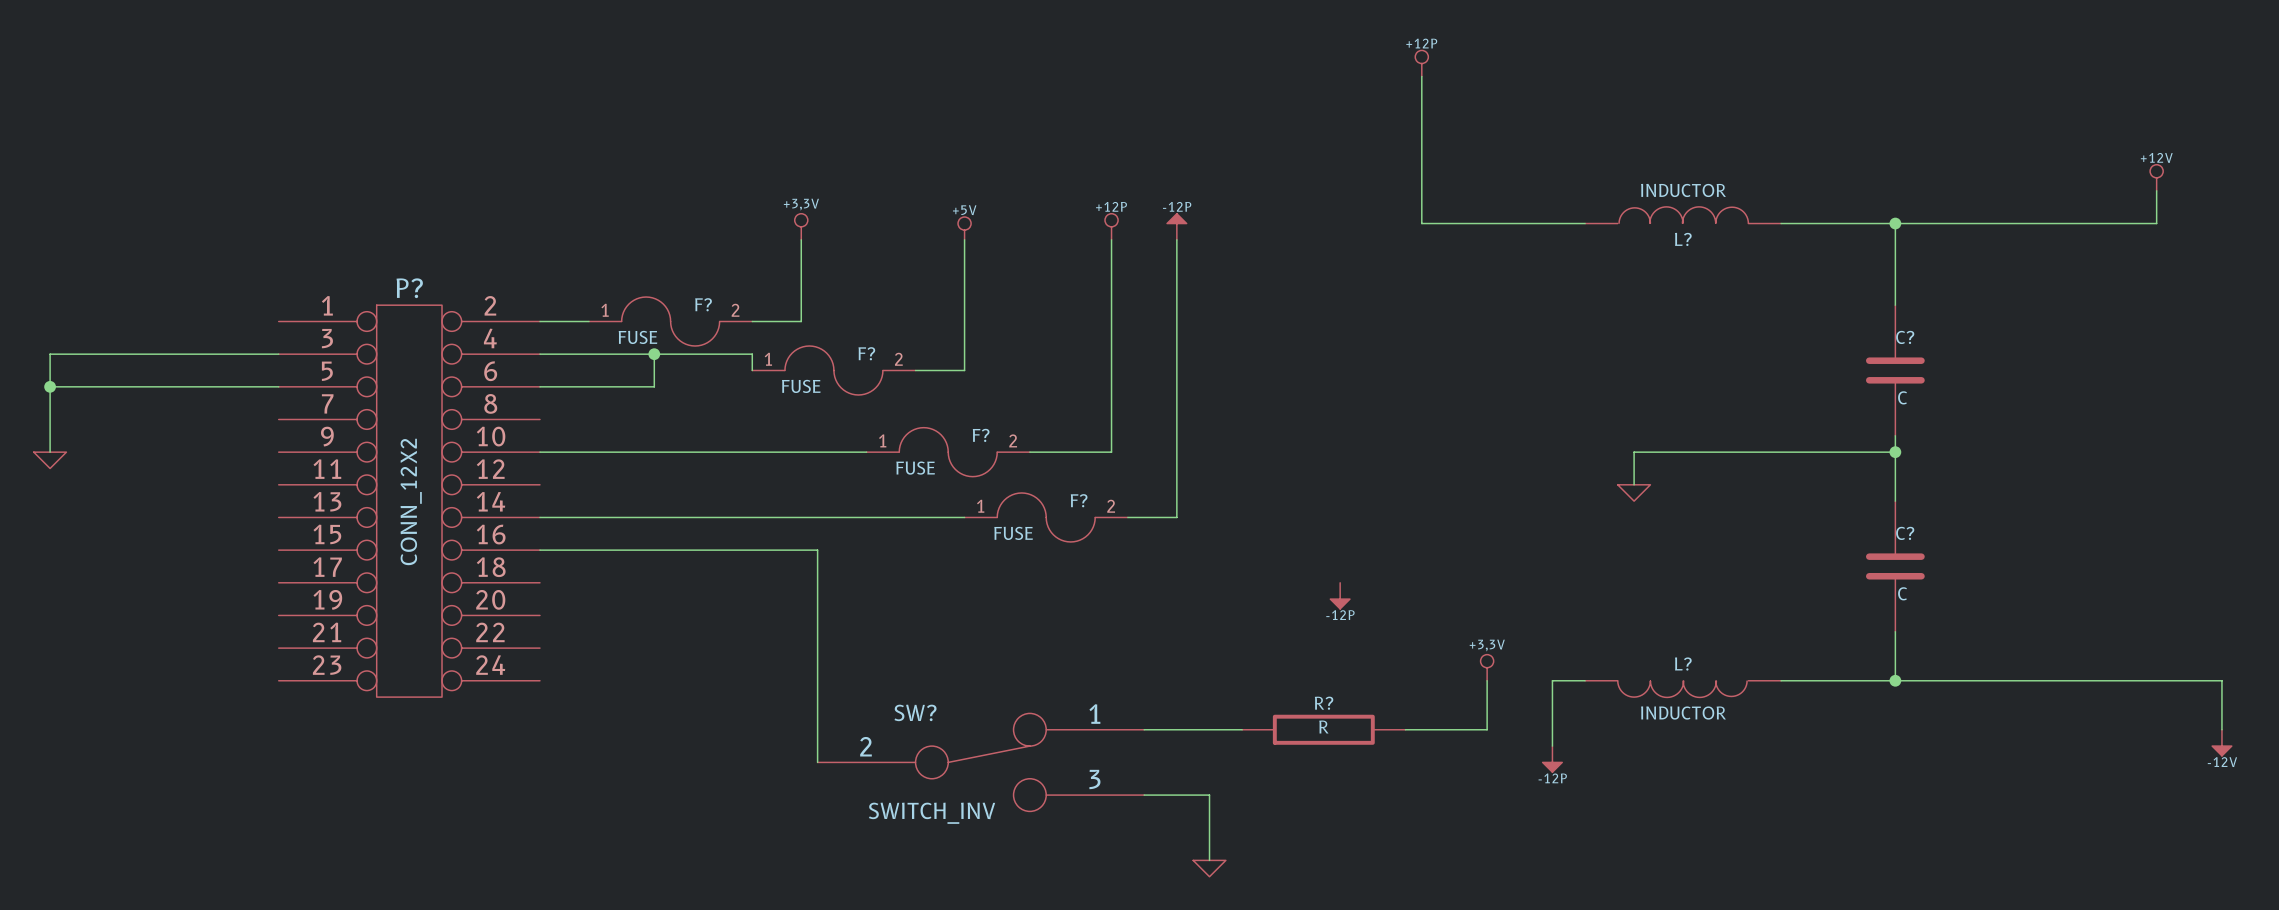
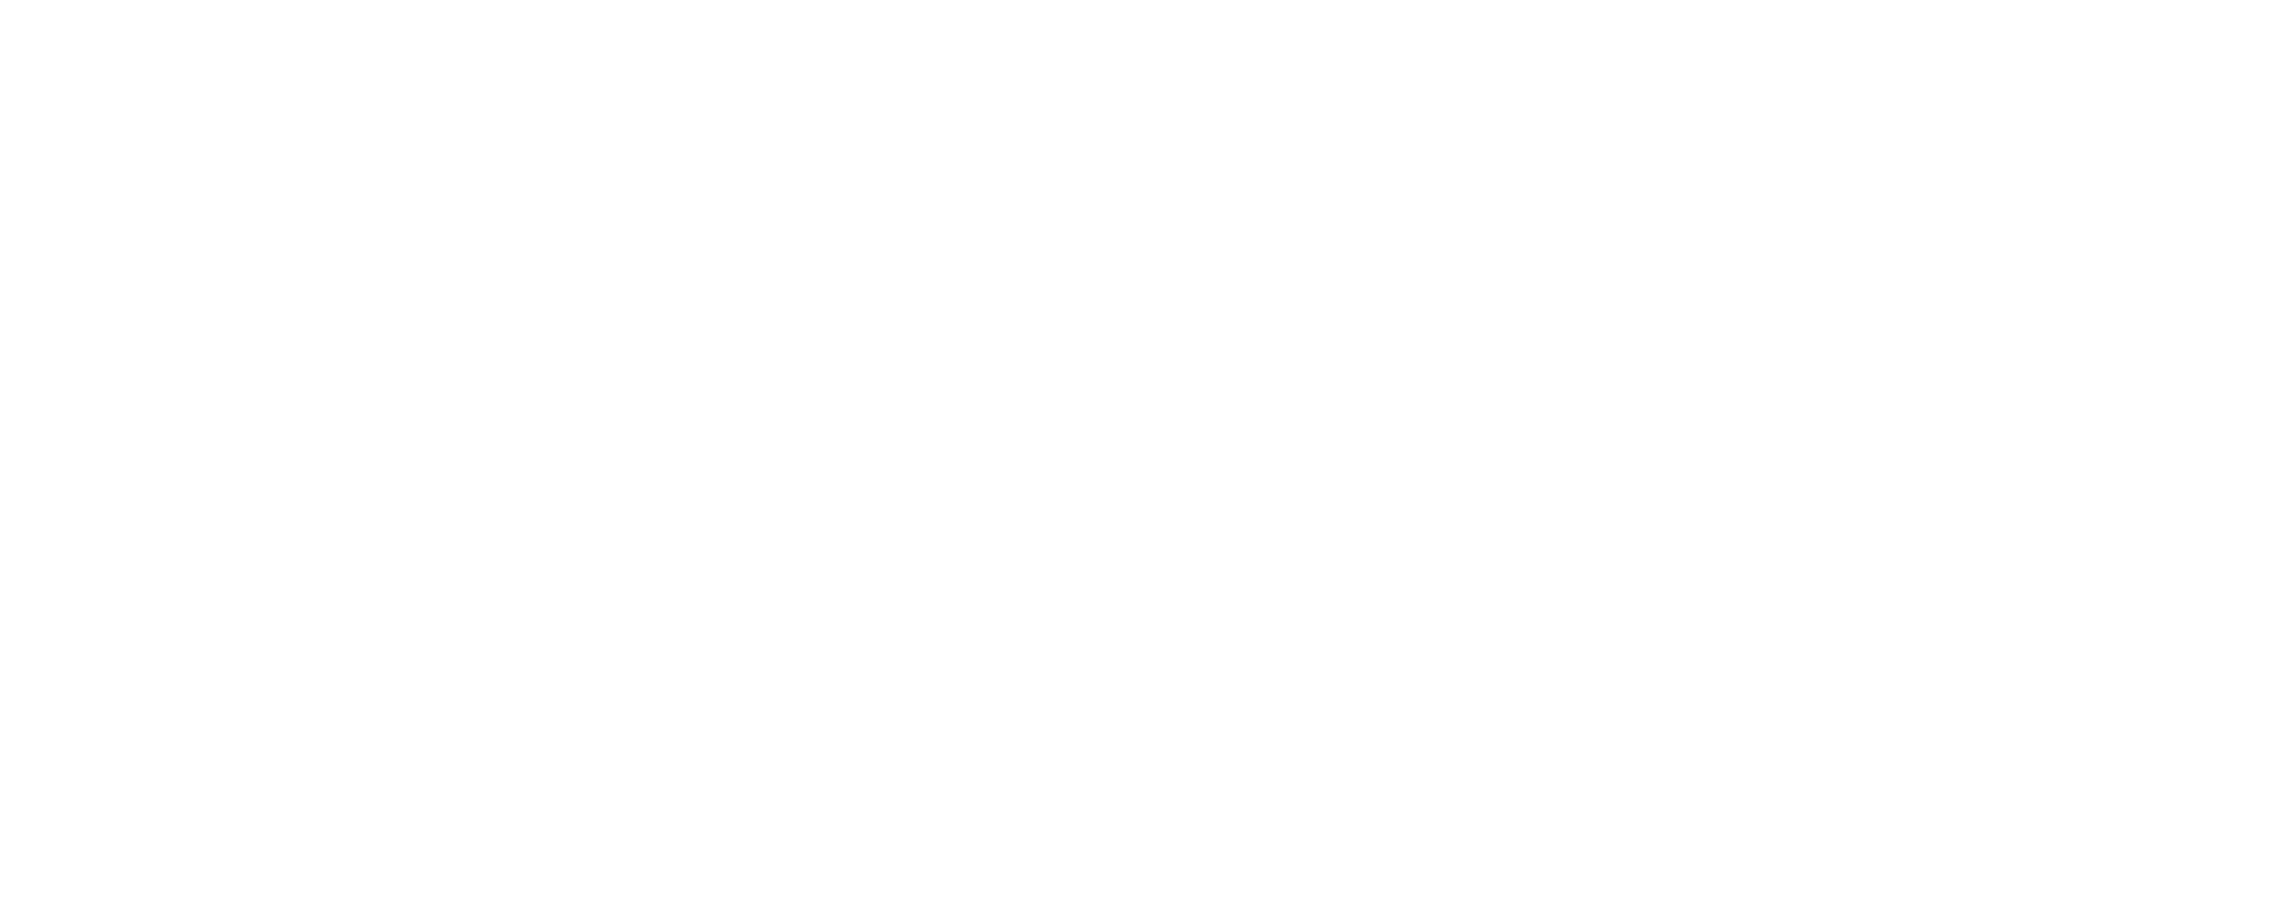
power symbol: +12P (1421, 63) -> none
wire: (1421, 76) (1421, 223) (1585, 223) -> none
power symbol: +12V (2156, 177) -> none
wire: (2156, 190) (2156, 223) (1781, 223) -> none
L?: INDUCTOR (1683, 215) -> none
wire: (1895, 223) (1895, 305) -> none
junction: (1895, 223) -> none
power symbol: +3,3V (801, 226) -> none
power symbol: +12P (1111, 226) -> none
power symbol: -12P (1176, 226) -> none
power symbol: +5V (964, 228) -> none
wire: (801, 239) (801, 321) (752, 321) -> none
wire: (964, 239) (964, 370) (915, 370) -> none
wire: (1111, 239) (1111, 452) (1029, 452) -> none
wire: (1176, 239) (1176, 517) (1127, 517) -> none
wire: (539, 321) (588, 321) -> none
F?: FUSE (670, 321) -> none
wire: (278, 354) (50, 354) (50, 452) -> none
wire: (539, 354) (752, 354) (752, 370) -> none
wire: (654, 354) (654, 386) (539, 386) -> none
junction: (654, 354) -> none
F?: FUSE (833, 370) -> none
C?: C (1895, 370) -> none
wire: (50, 386) (278, 386) -> none
junction: (50, 386) -> none
wire: (1895, 435) (1895, 501) -> none
wire: (539, 452) (866, 452) -> none
F?: FUSE (948, 452) -> none
wire: (1895, 452) (1634, 452) (1634, 484) -> none
junction: (1895, 452) -> none
power symbol: (50, 460) -> none
power symbol: (1634, 492) -> none
P?: CONN_12X2 (409, 501) -> none
wire: (539, 517) (964, 517) -> none
F?: FUSE (1046, 517) -> none
wire: (539, 550) (817, 550) (817, 762) -> none
C?: C (1895, 566) -> none
power symbol: -12P (1340, 595) -> none
wire: (1895, 631) (1895, 680) -> none
power symbol: +3,3V (1487, 667) -> none
wire: (1487, 680) (1487, 729) (1405, 729) -> none
wire: (1585, 680) (1552, 680) (1552, 746) -> none
wire: (1781, 680) (2221, 680) (2221, 729) -> none
junction: (1895, 680) -> none
L?: INDUCTOR (1683, 689) -> none
wire: (1144, 729) (1242, 729) -> none
R?: R (1323, 729) -> none
power symbol: -12V (2221, 742) -> none
power symbol: -12P (1552, 759) -> none
SW?: SWITCH_INV (980, 762) -> none
wire: (1144, 795) (1209, 795) (1209, 860) -> none
power symbol: (1209, 868) -> none

